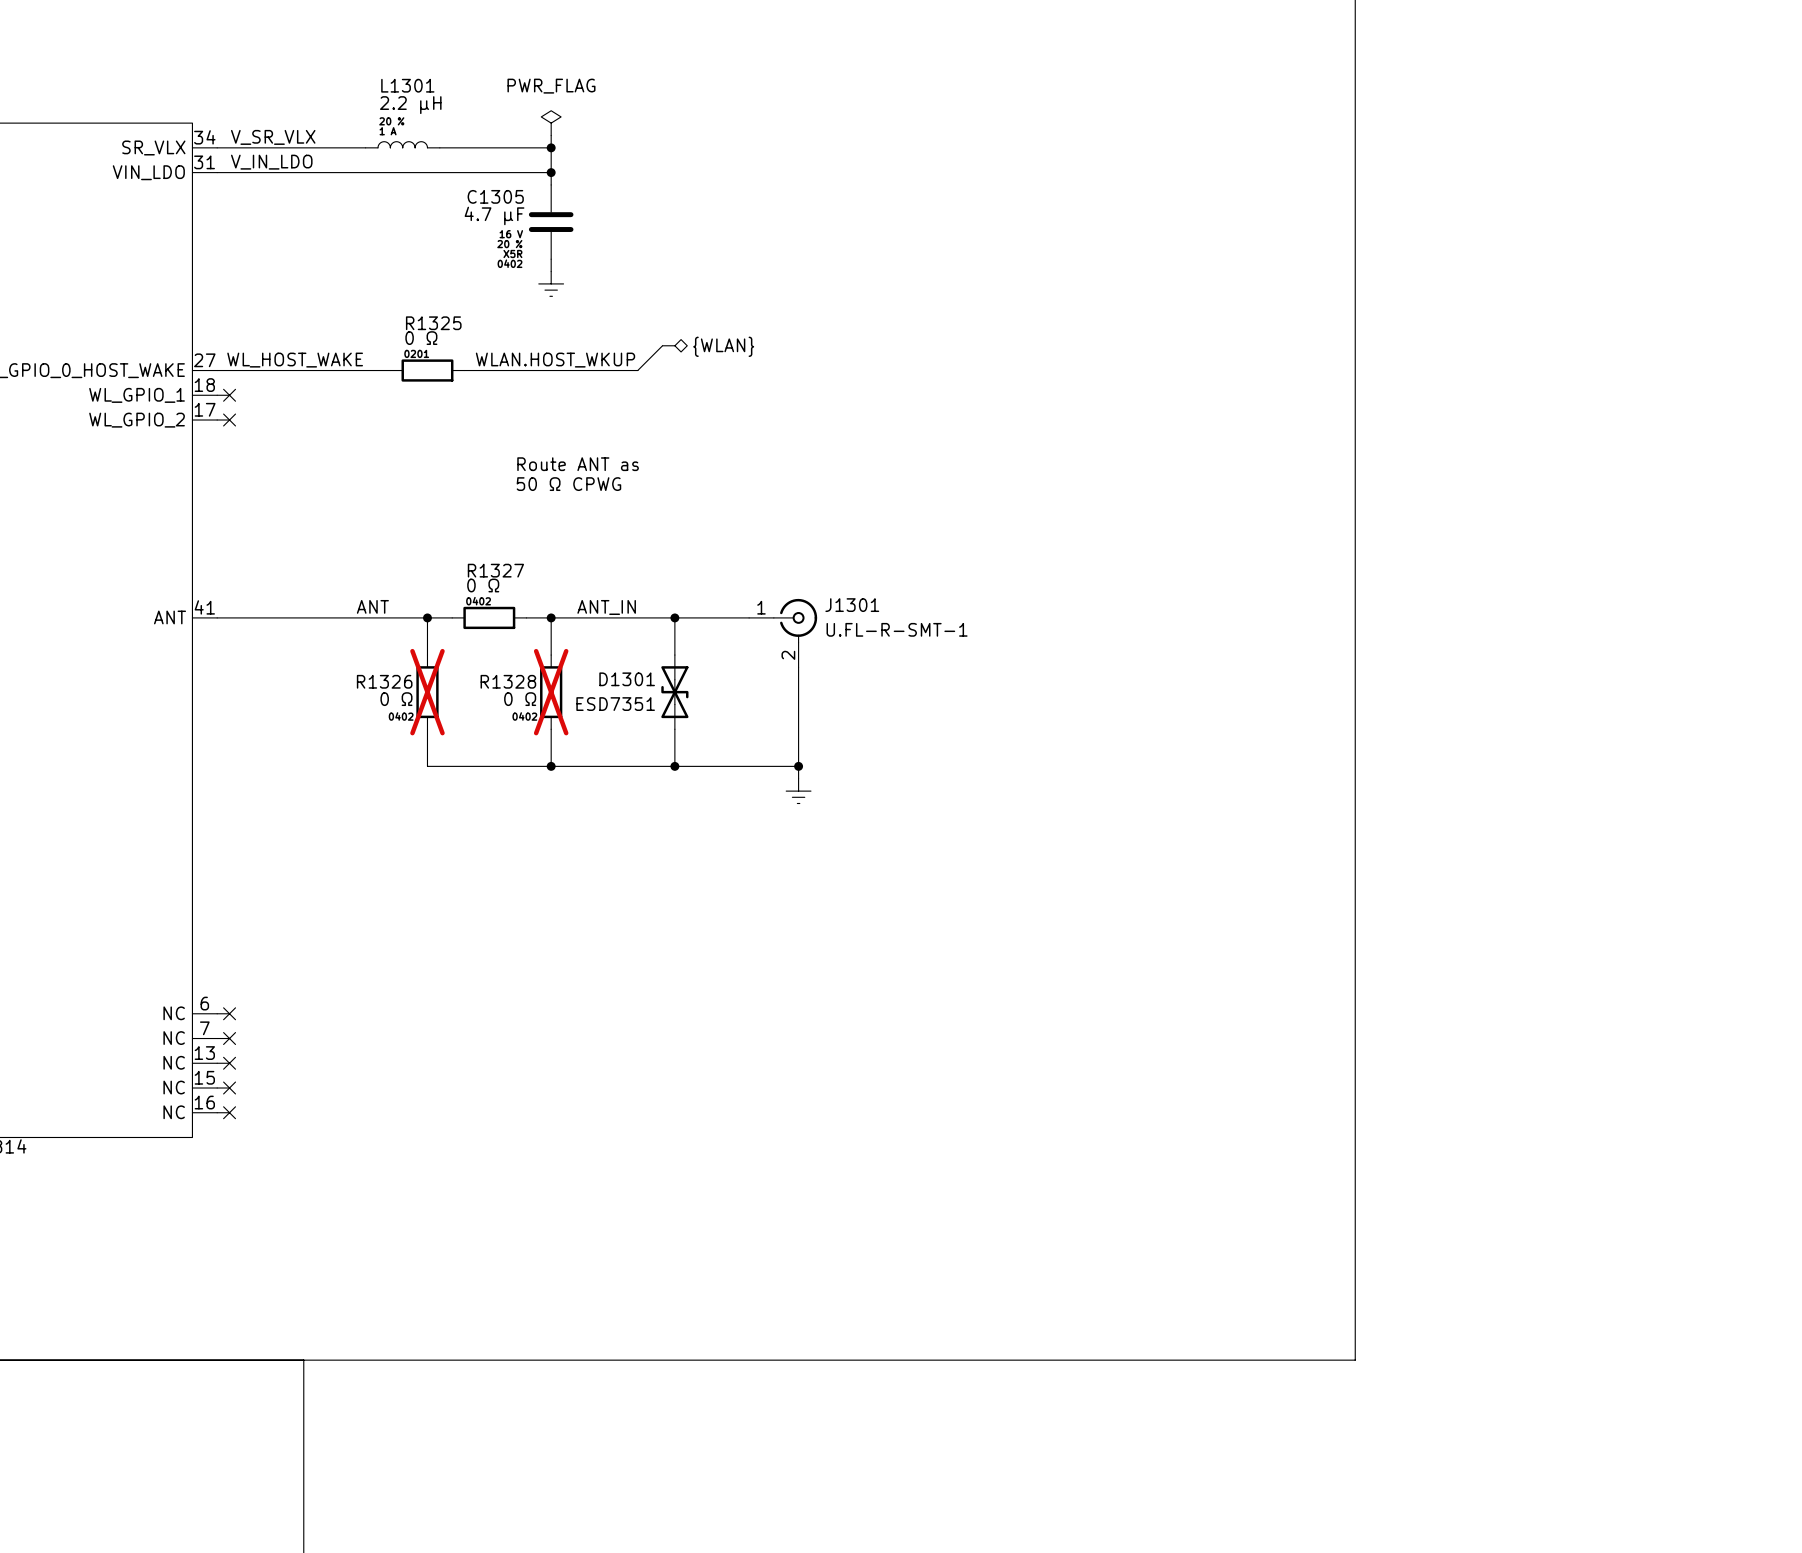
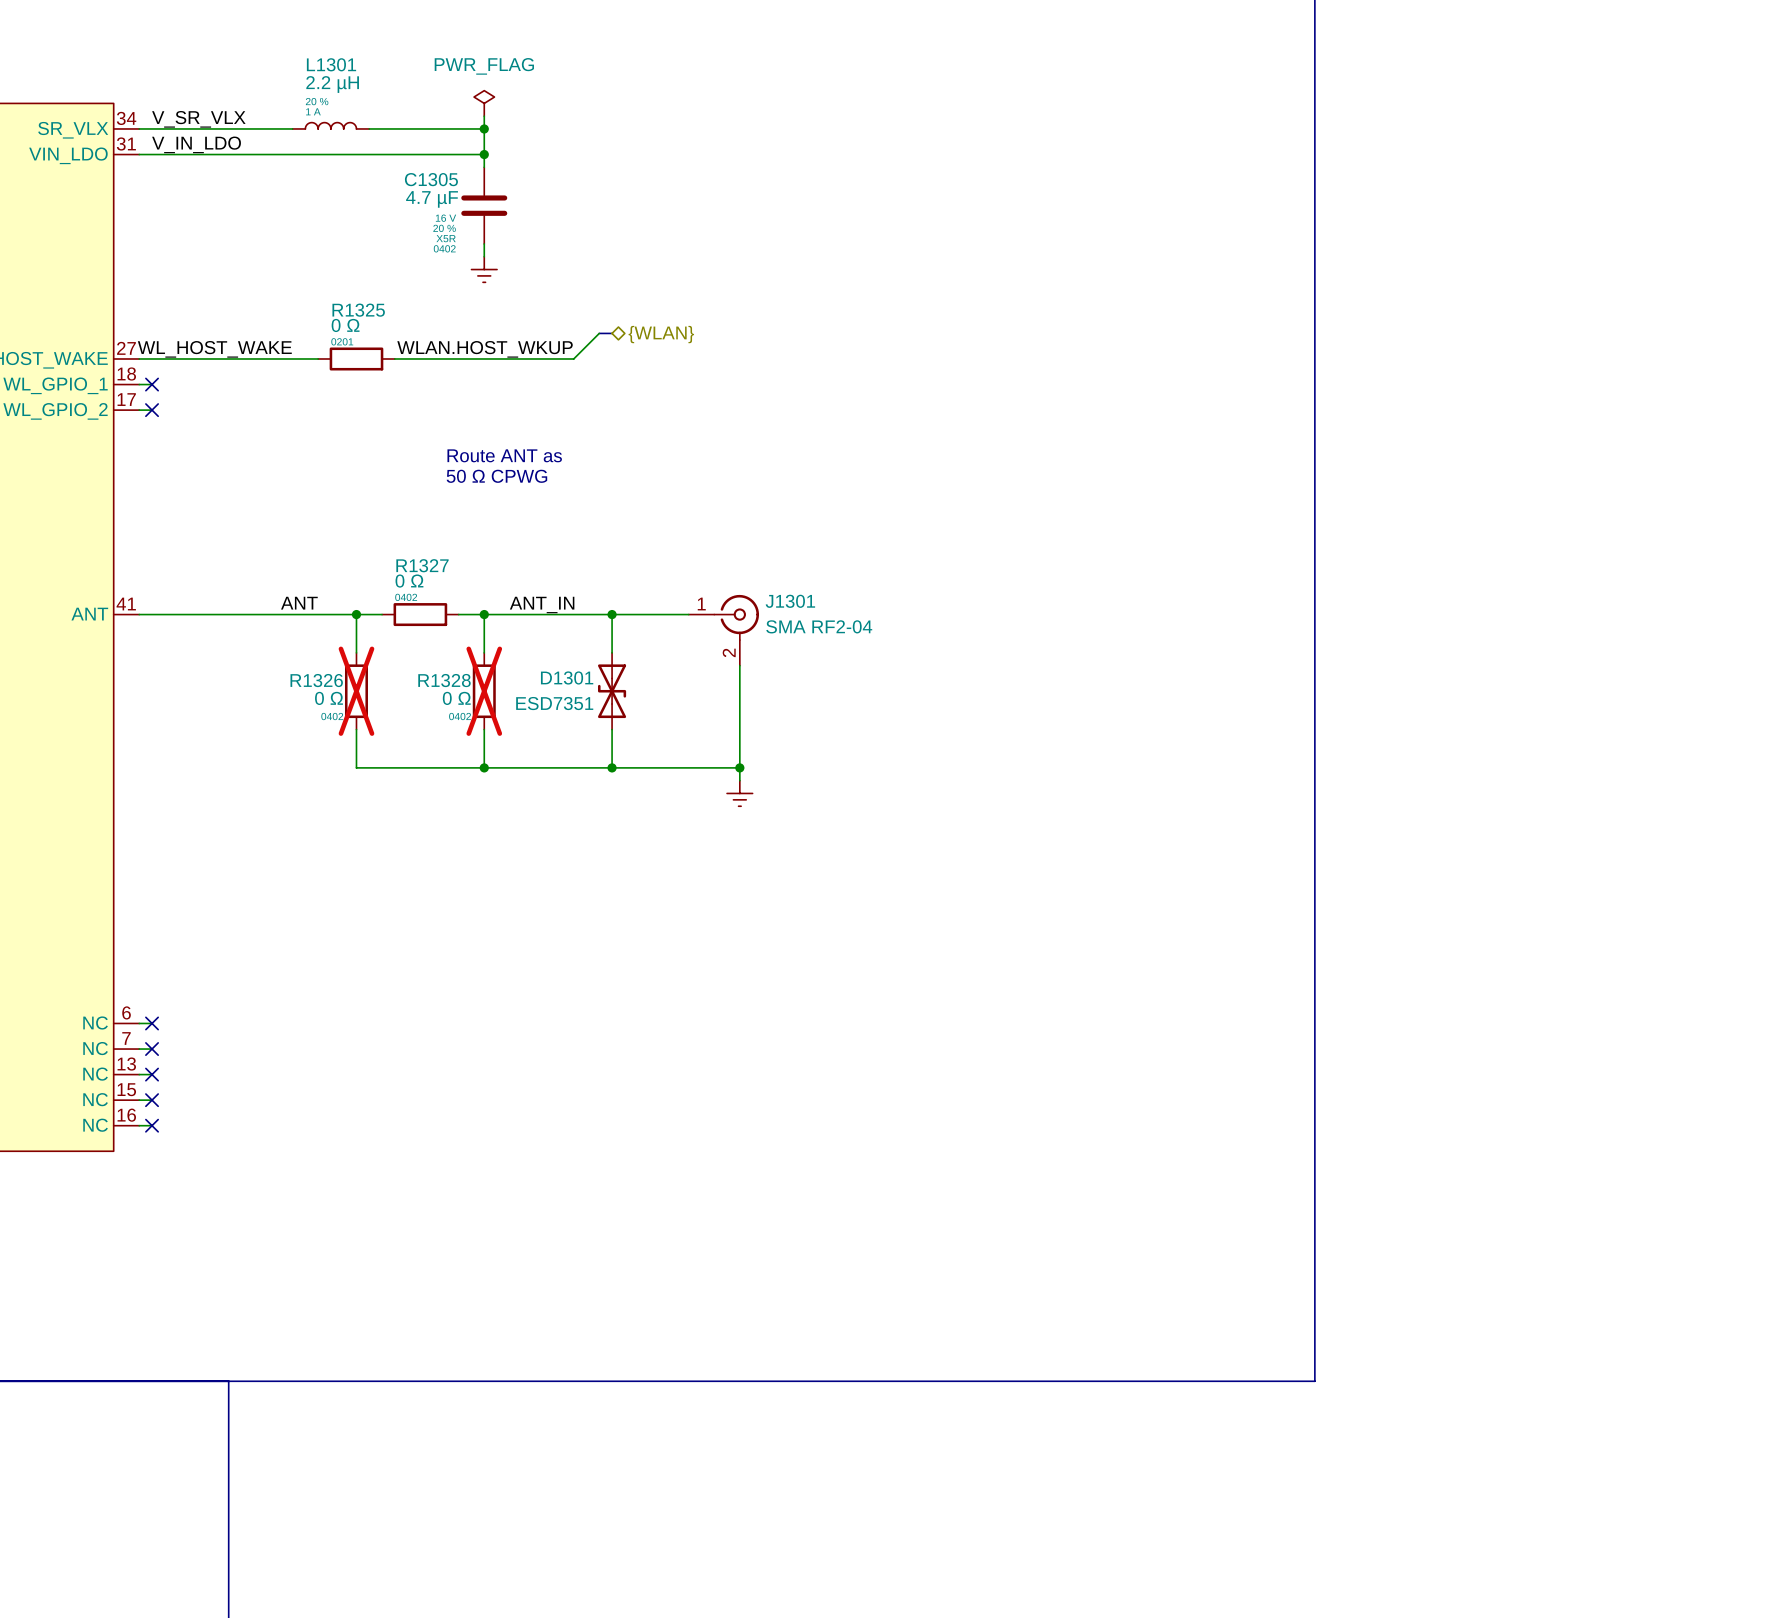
J1301 value: U.FL-R-SMT-1 (897, 629) -> SMA RF2-04 (819, 626)

